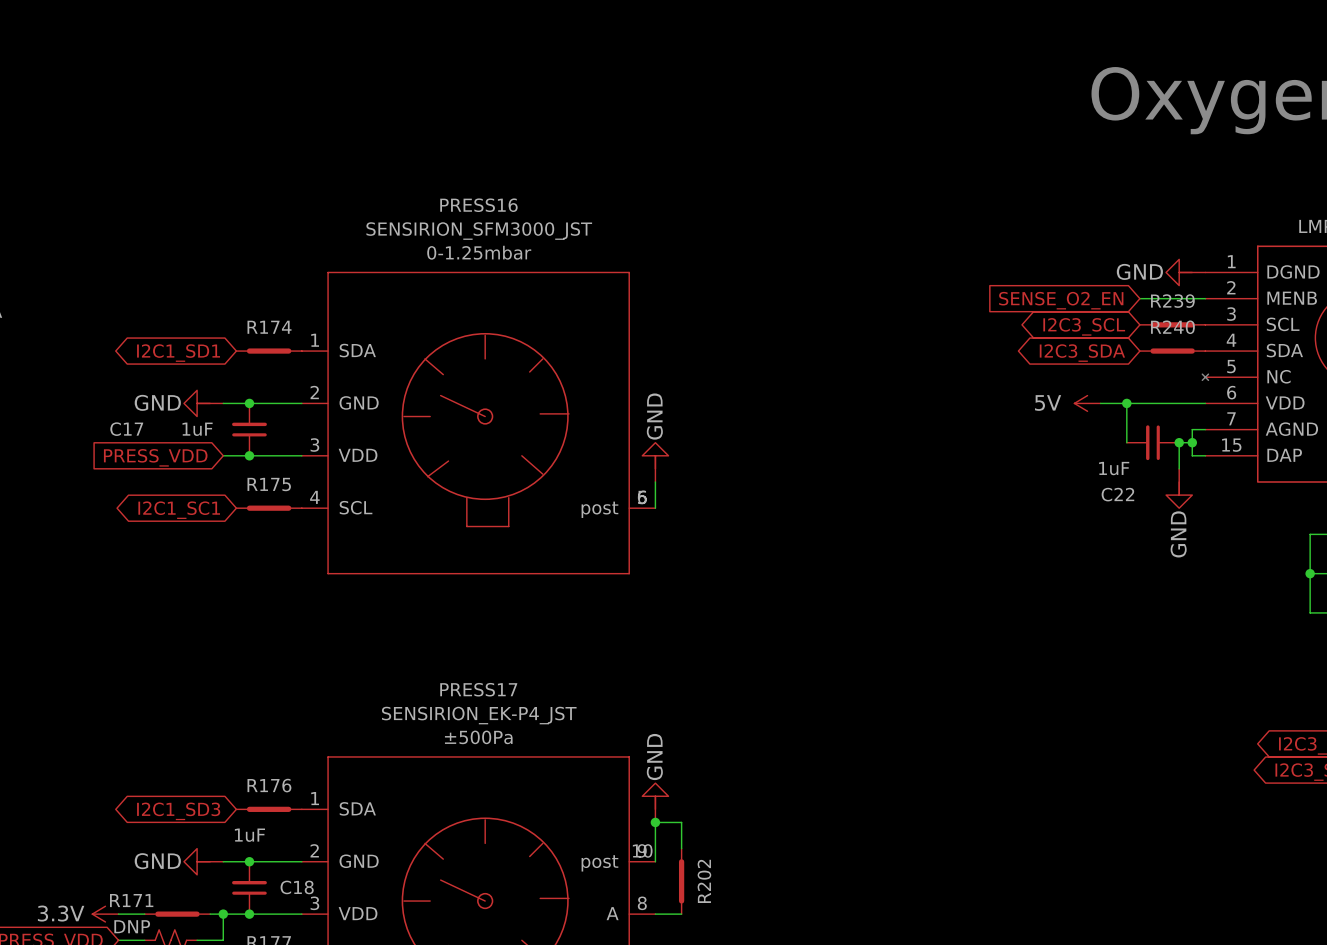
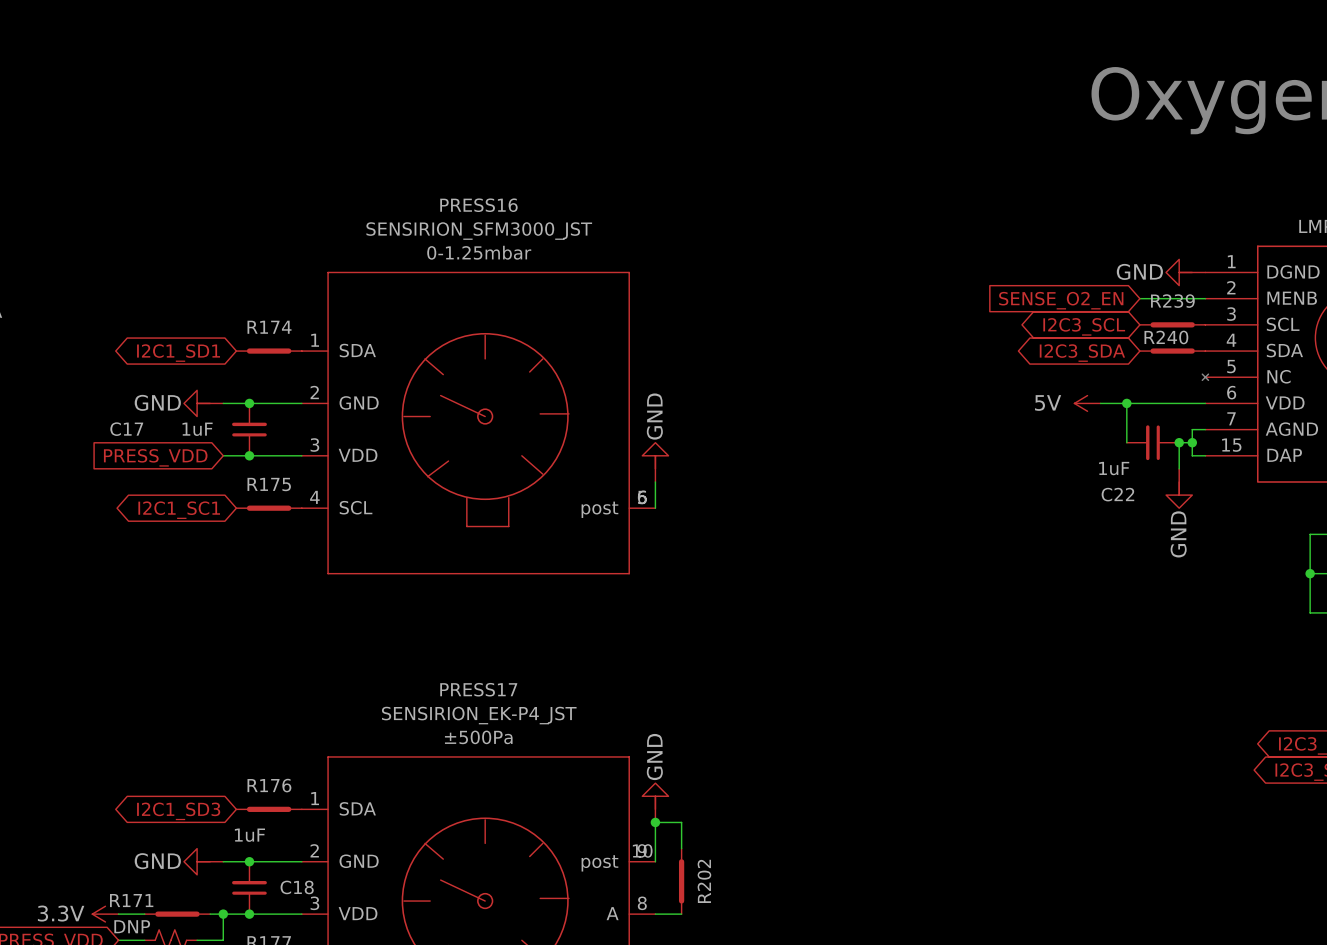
R240 name position: R240 (1172, 327) -> R240 (1166, 337)

